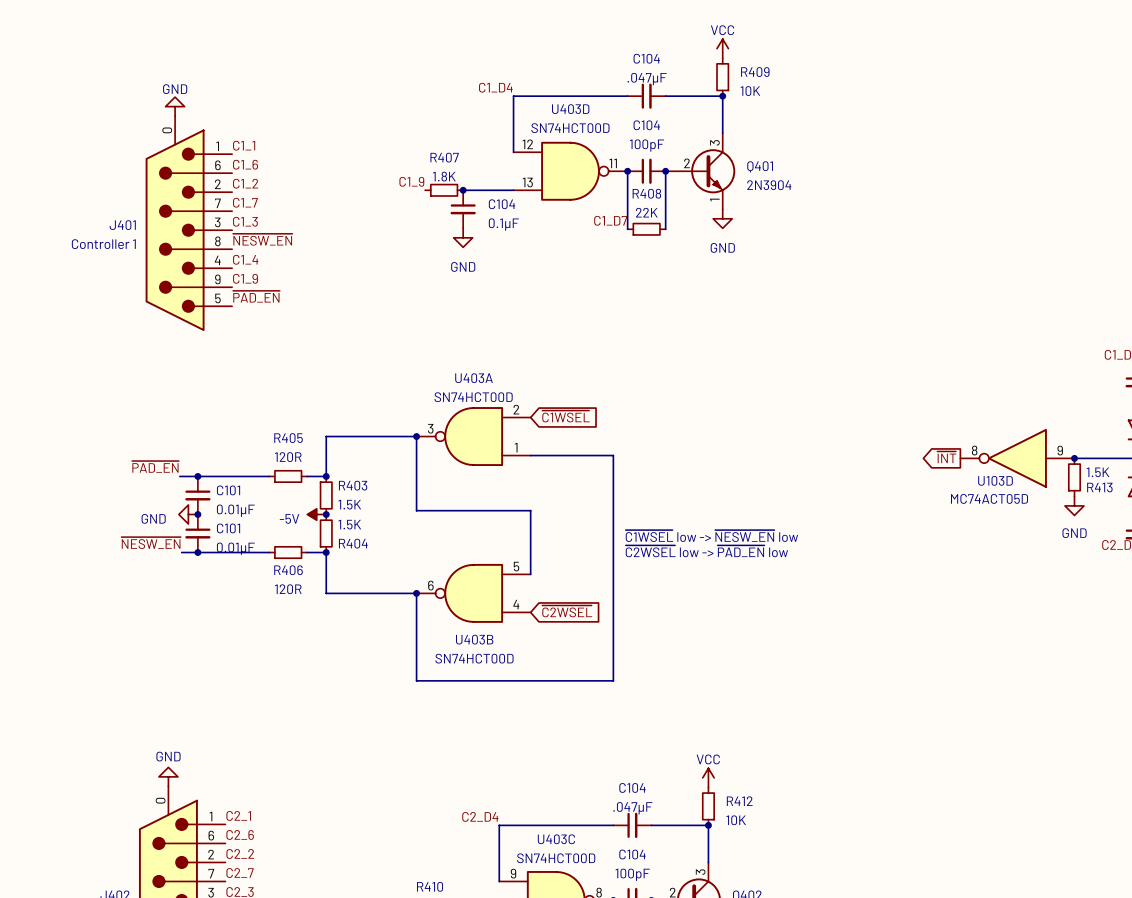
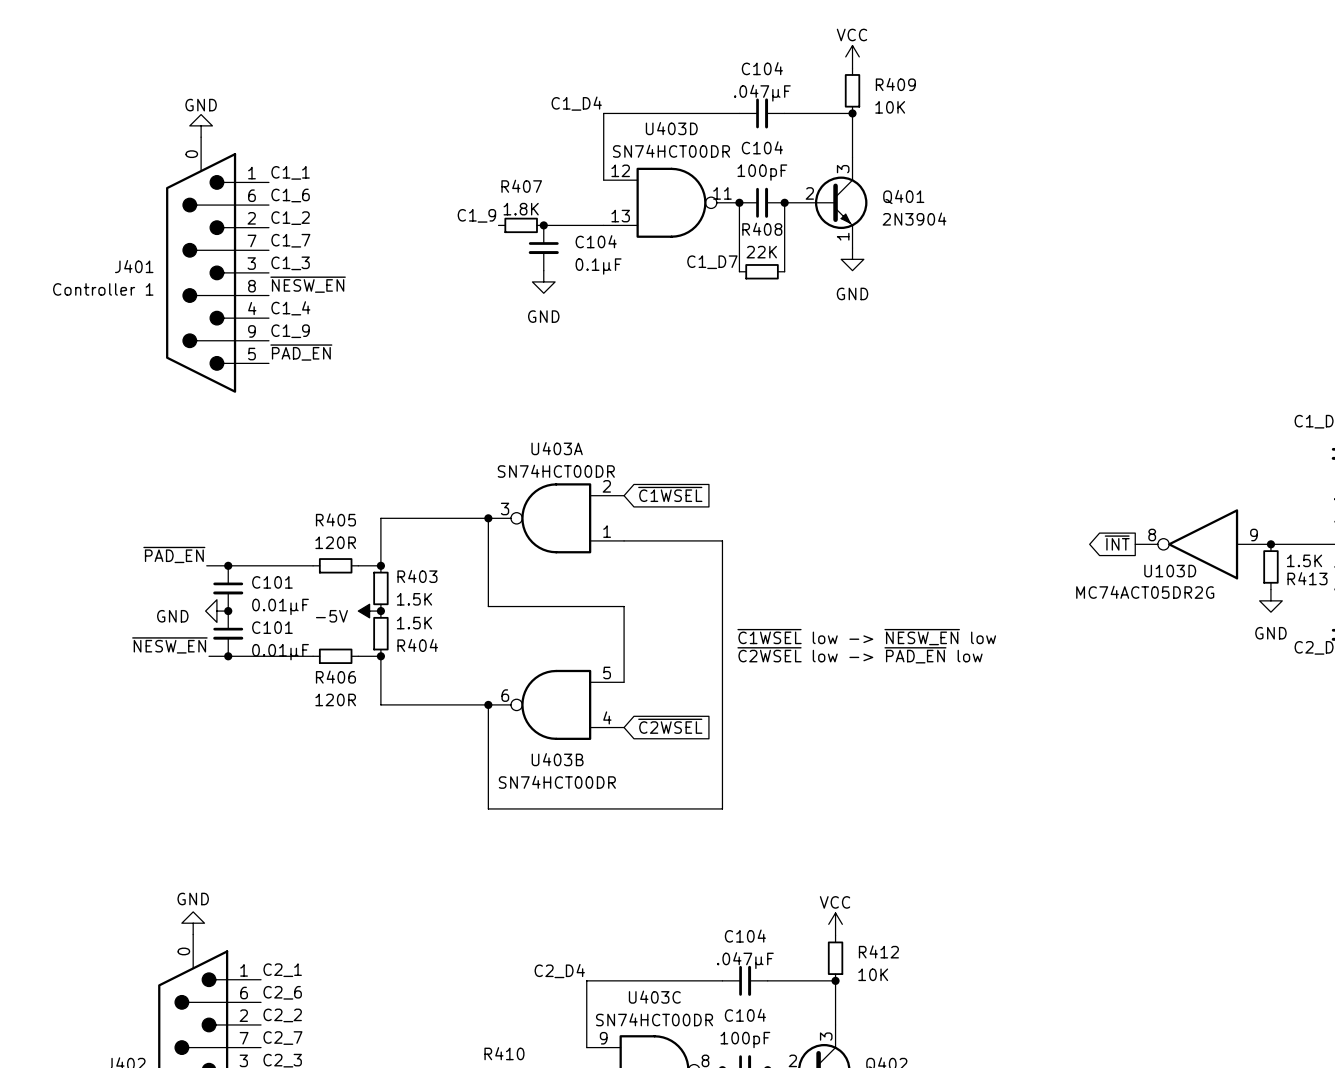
U403D value: SN74HCT00D (570, 128) -> SN74HCT00DR (671, 151)
U403A value: SN74HCT00D (473, 397) -> SN74HCT00DR (556, 471)
U103D value: MC74ACT05D (989, 498) -> MC74ACT05DR2G (1145, 592)
U403B value: SN74HCT00D (474, 658) -> SN74HCT00DR (557, 782)
U403C value: SN74HCT00D (556, 858) -> SN74HCT00DR (654, 1019)

